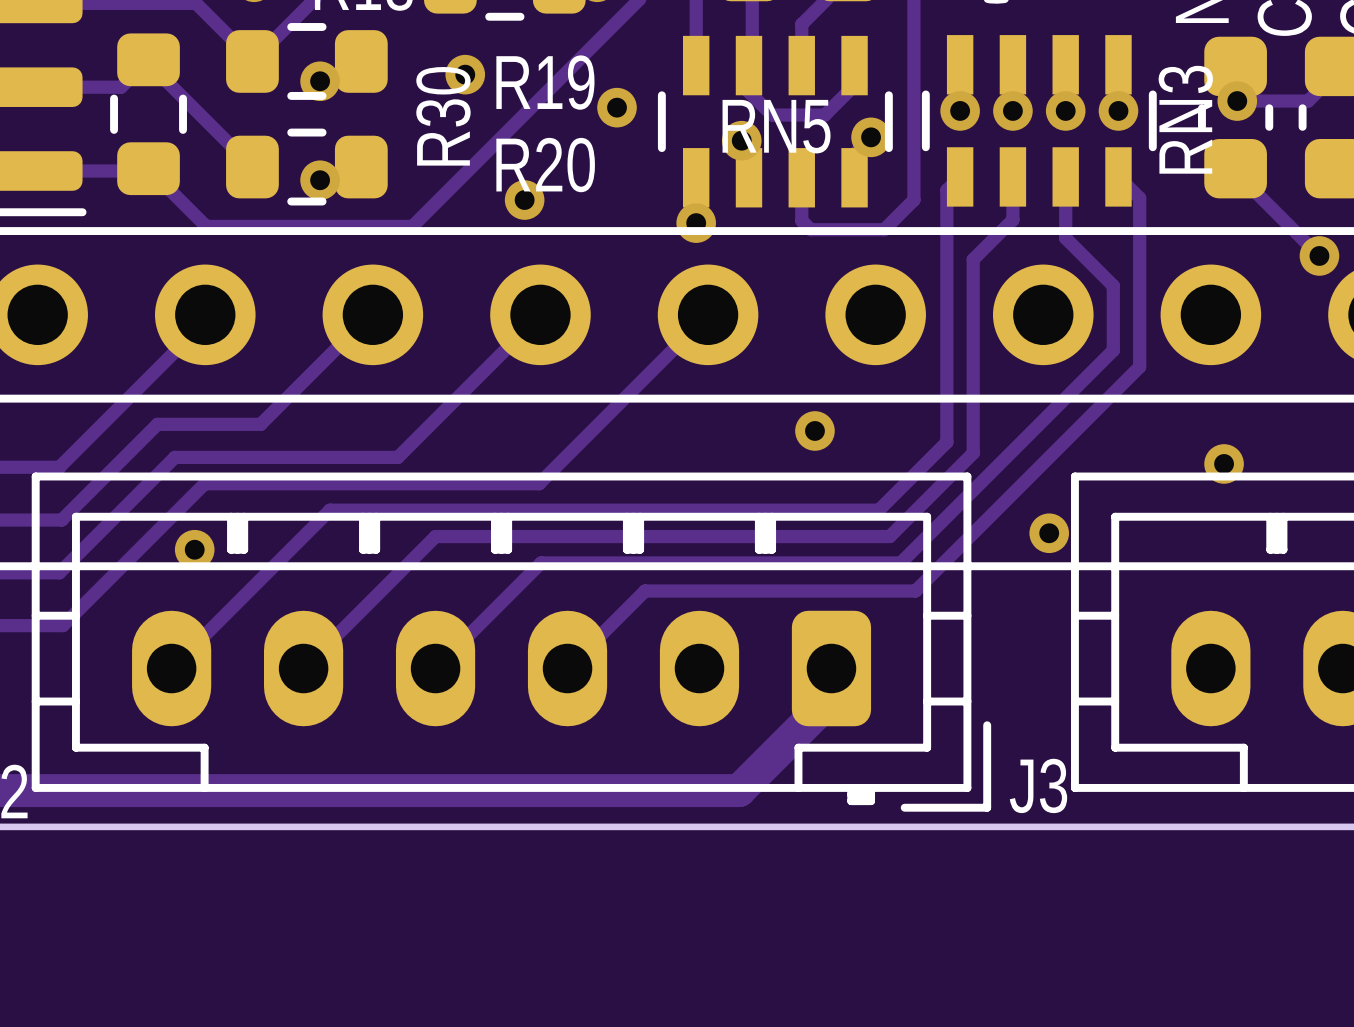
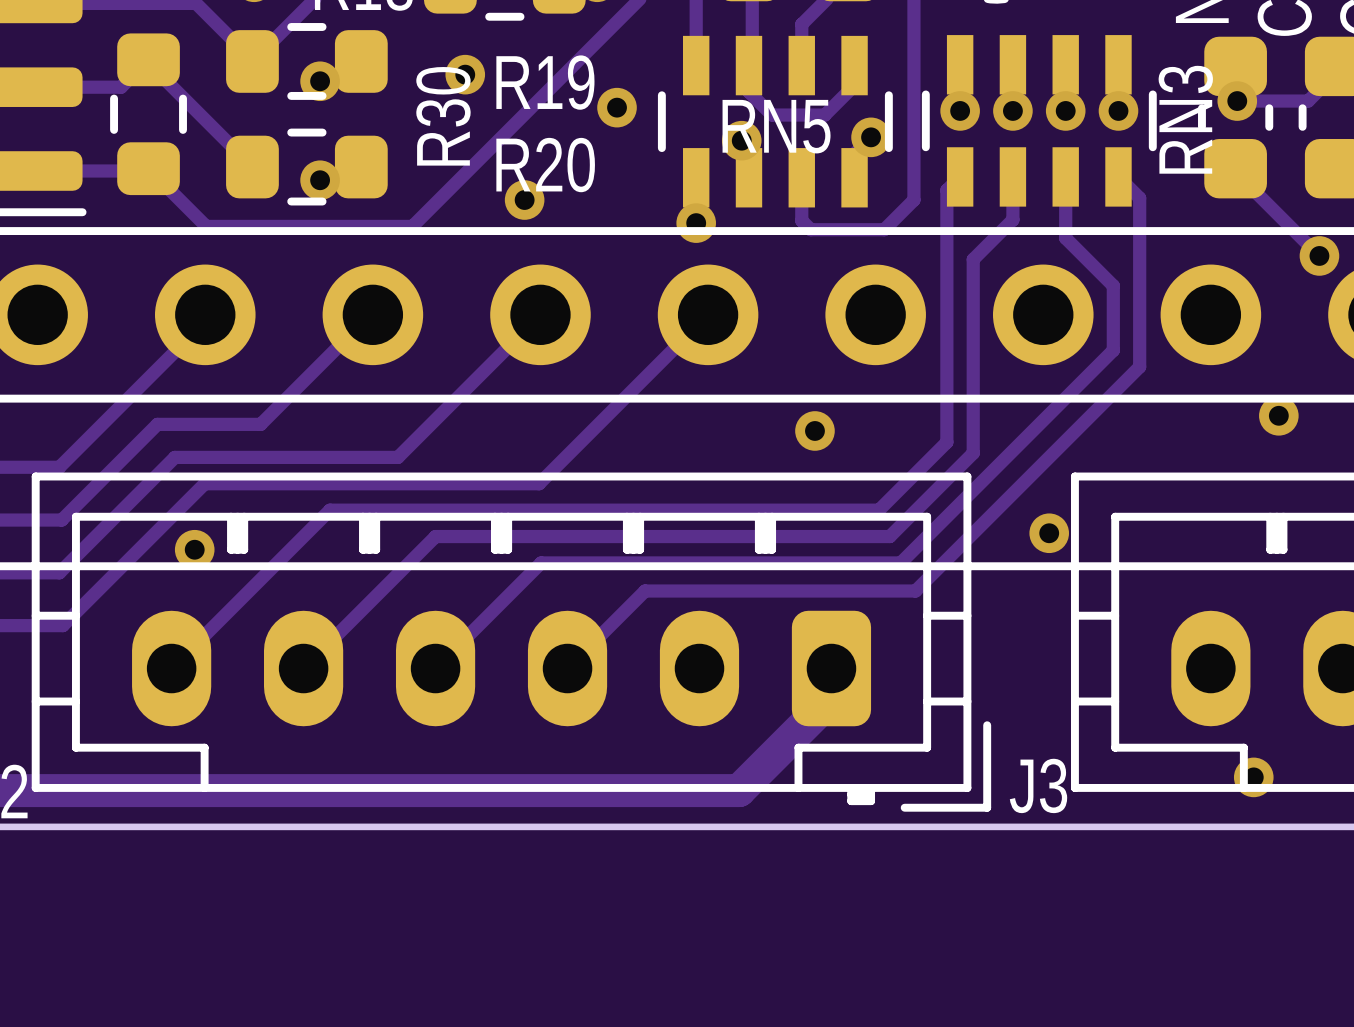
via position: (1224, 463) -> (1278, 415)
via: none -> (1253, 777)

